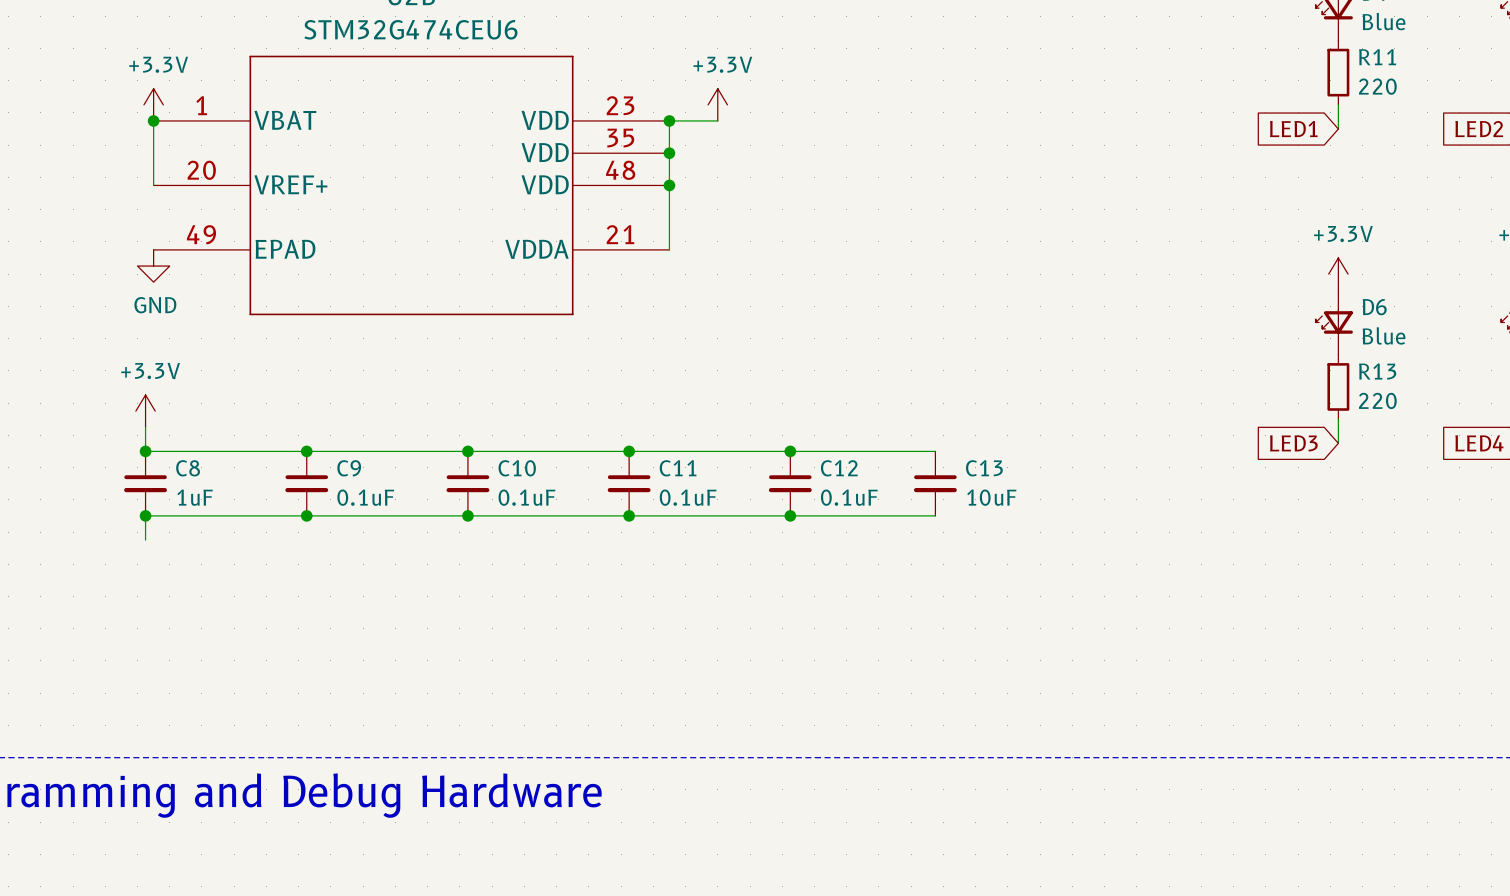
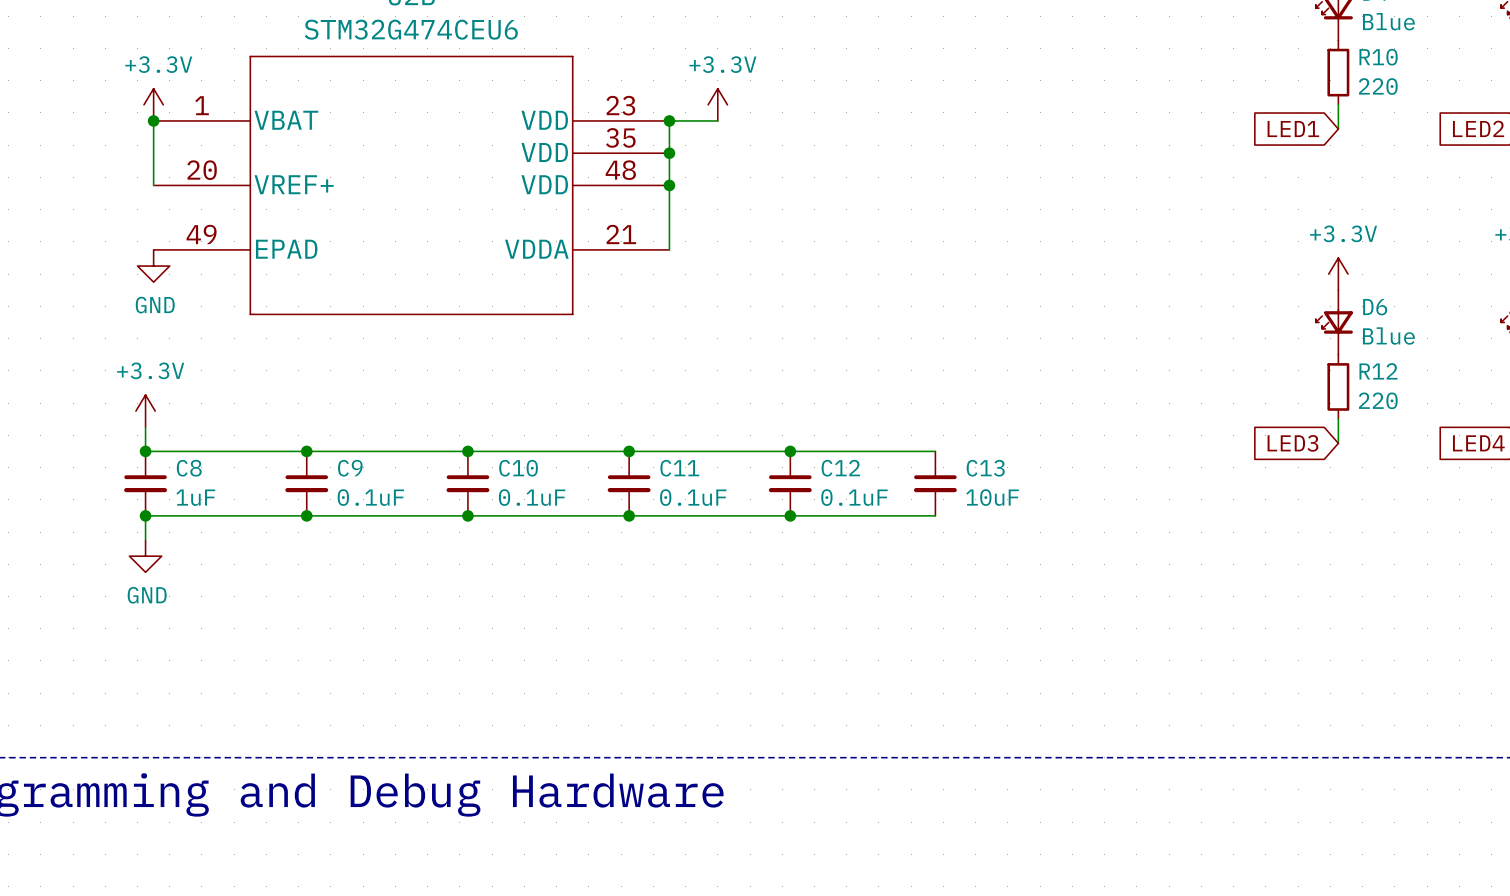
R11 name: R11 (1377, 57) -> R10 (1378, 57)
R13 name: R13 (1377, 371) -> R12 (1378, 371)
power symbol: none -> GND (145, 556)

